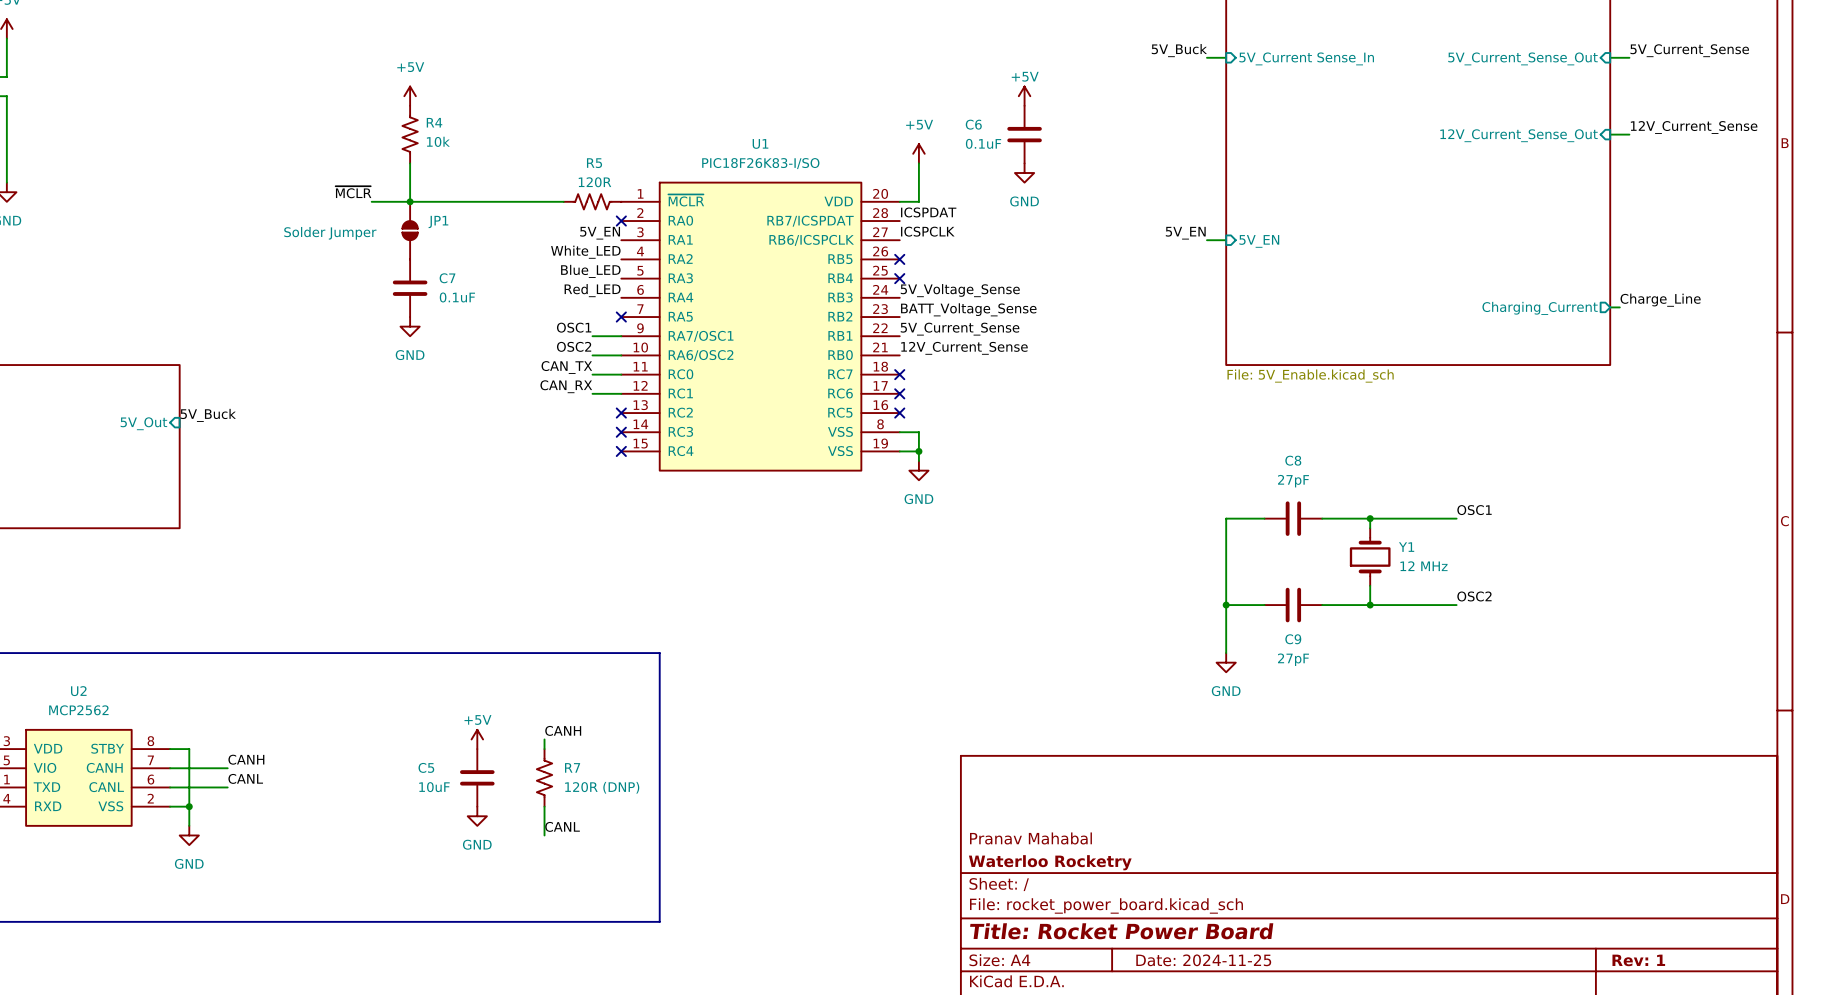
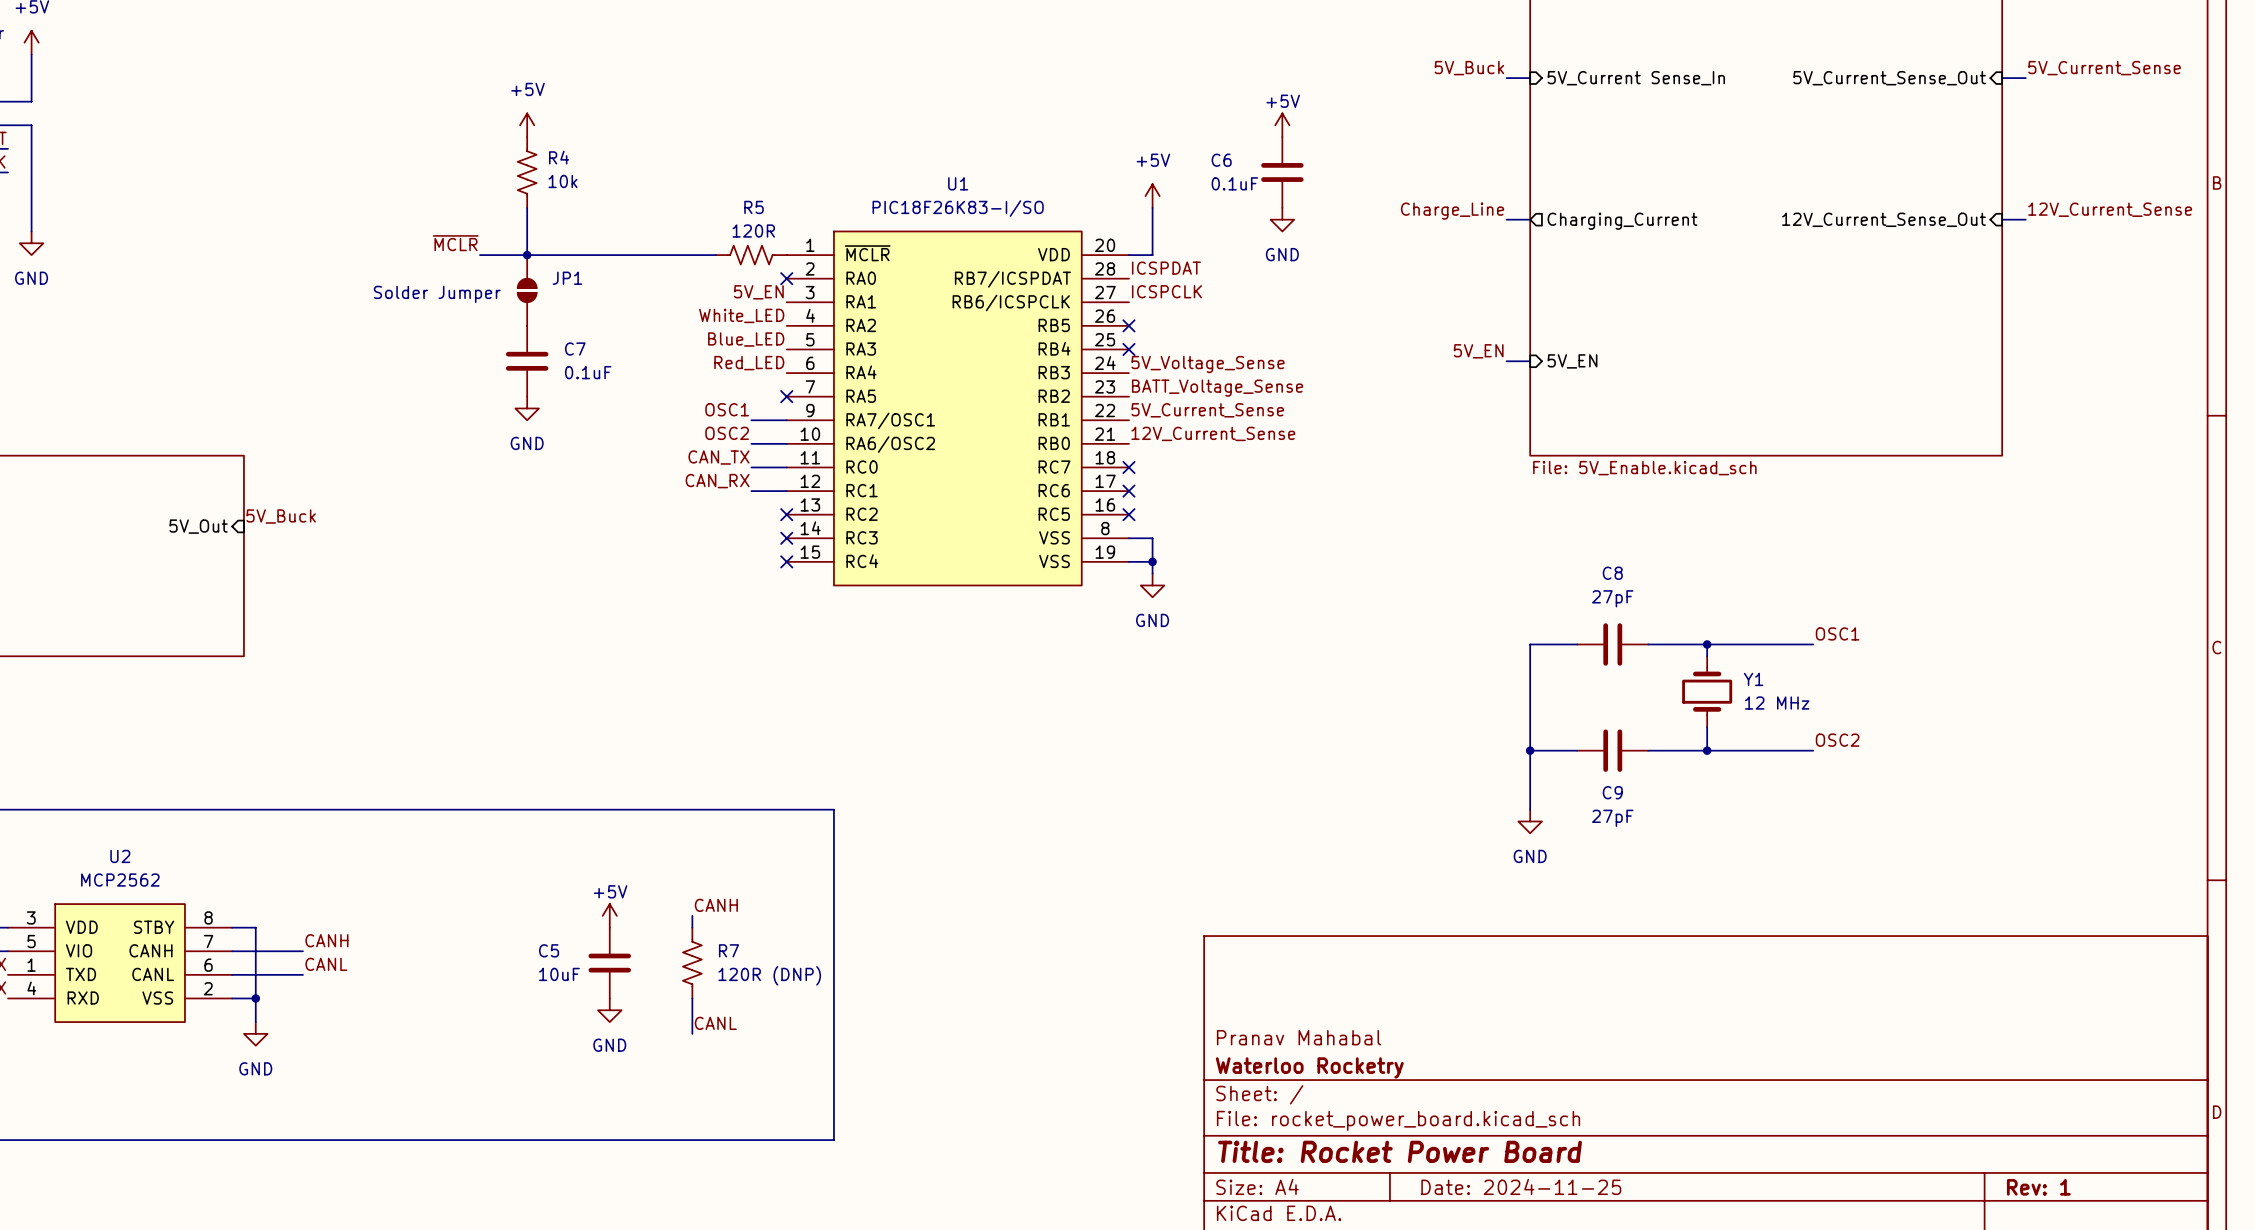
label position: 12V_Current_Sense (1694, 127) -> 12V_Current_Sense (2110, 209)
wire: (1610, 134) (1629, 134) -> (2002, 219) (2025, 219)
sheet pin position: 12V_Current_Sense_Out (1519, 135) -> 12V_Current_Sense_Out (1883, 219)
label: none -> Charge_Line (1452, 211)
wire: none -> (1506, 219) (1530, 219)
sheet pin: none -> Charging_Current (1622, 221)
label position: 5V_EN (1185, 233) -> 5V_EN (1478, 351)
wire: (1206, 240) (1226, 240) -> (1506, 361) (1530, 361)
sheet pin position: 5V_EN (1259, 241) -> 5V_EN (1572, 361)
label: Charge_Line (1660, 300) -> none
wire: (1610, 307) (1619, 307) -> none
sheet pin: Charging_Current (1540, 308) -> none

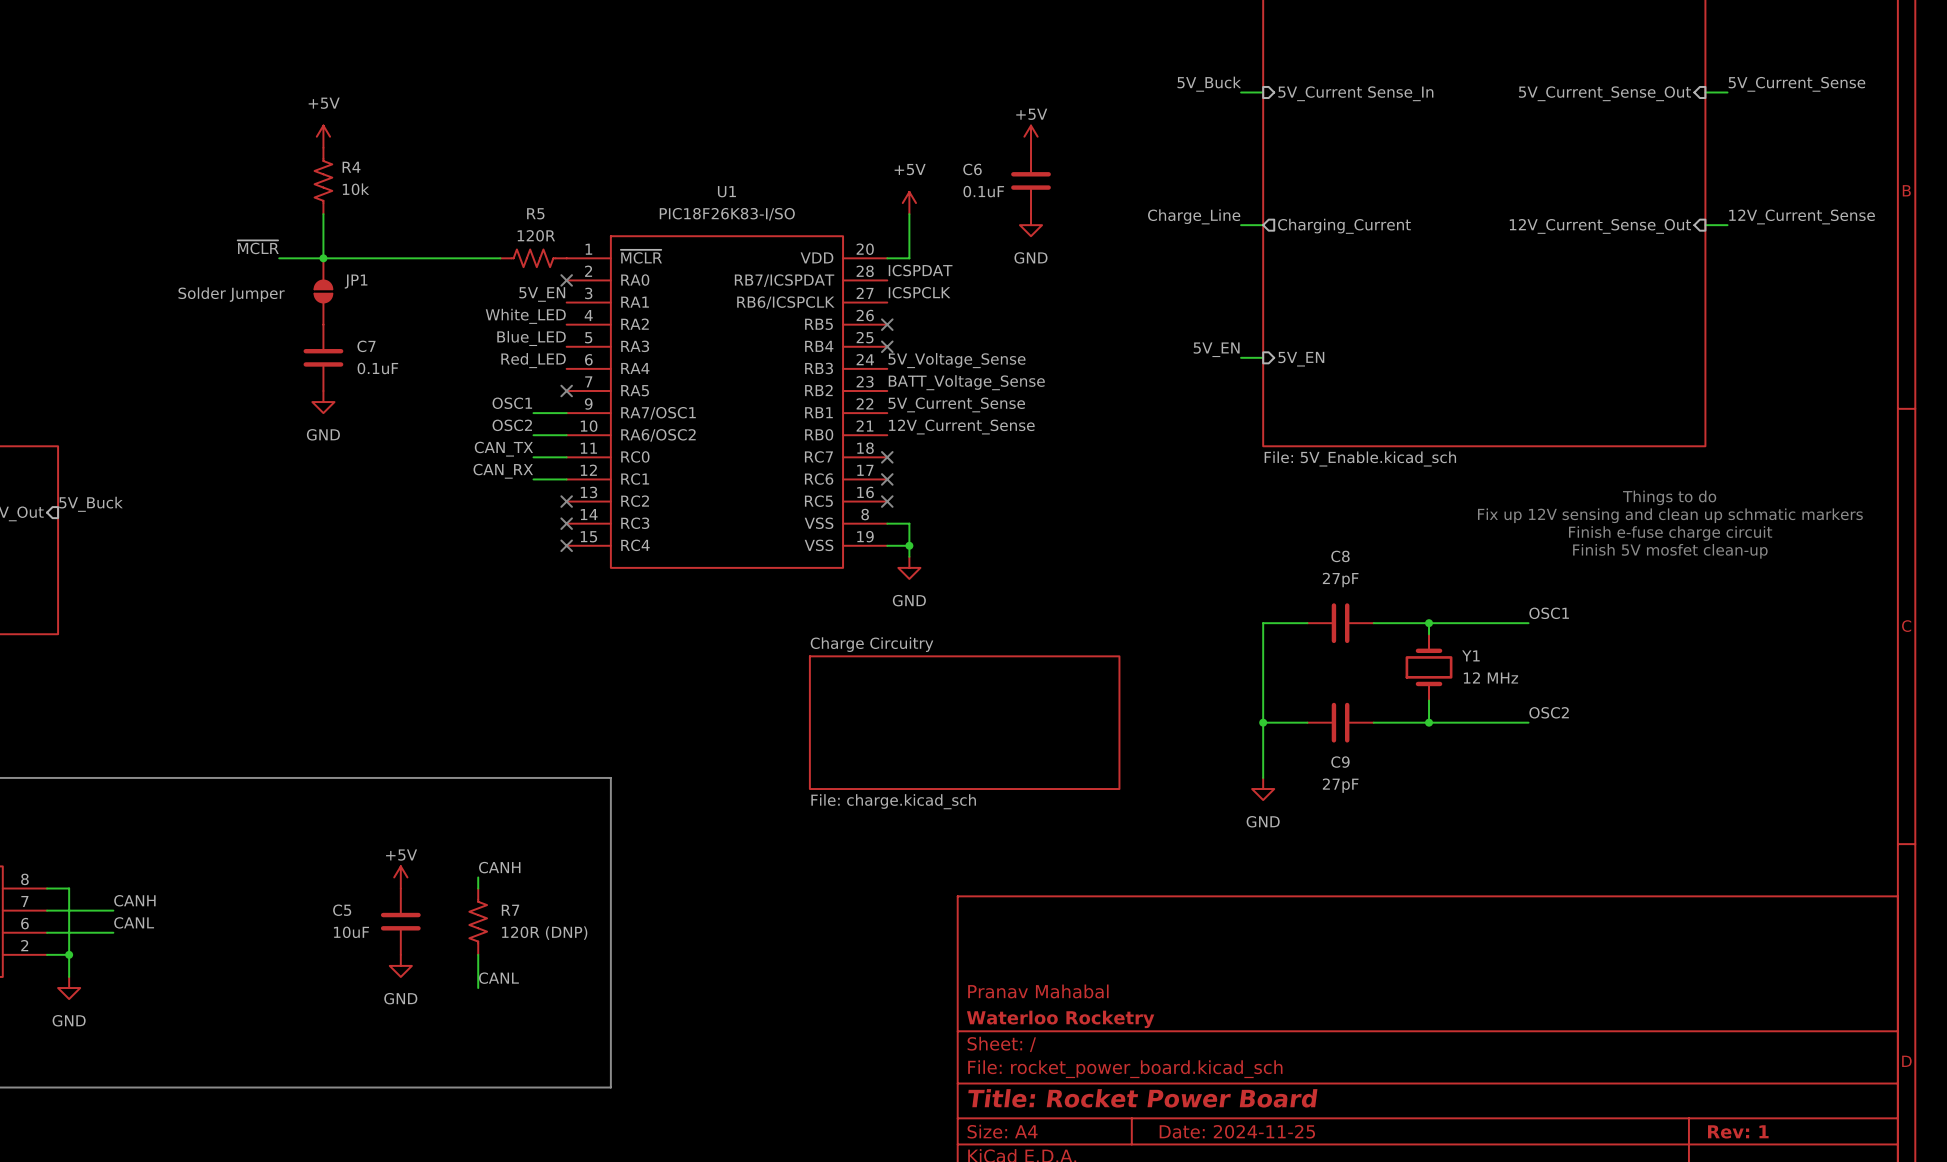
text: none -> Things to do (1669, 497)
text: none -> Fix up 12V sensing and clean up schmatic markers (1670, 515)
text: none -> Finish e-fuse charge circuit (1670, 533)
text: none -> Finish 5V mosfet clean-up (1670, 551)
sheet Charge Circuitry: none -> File: charge.kicad_sch (964, 722)

